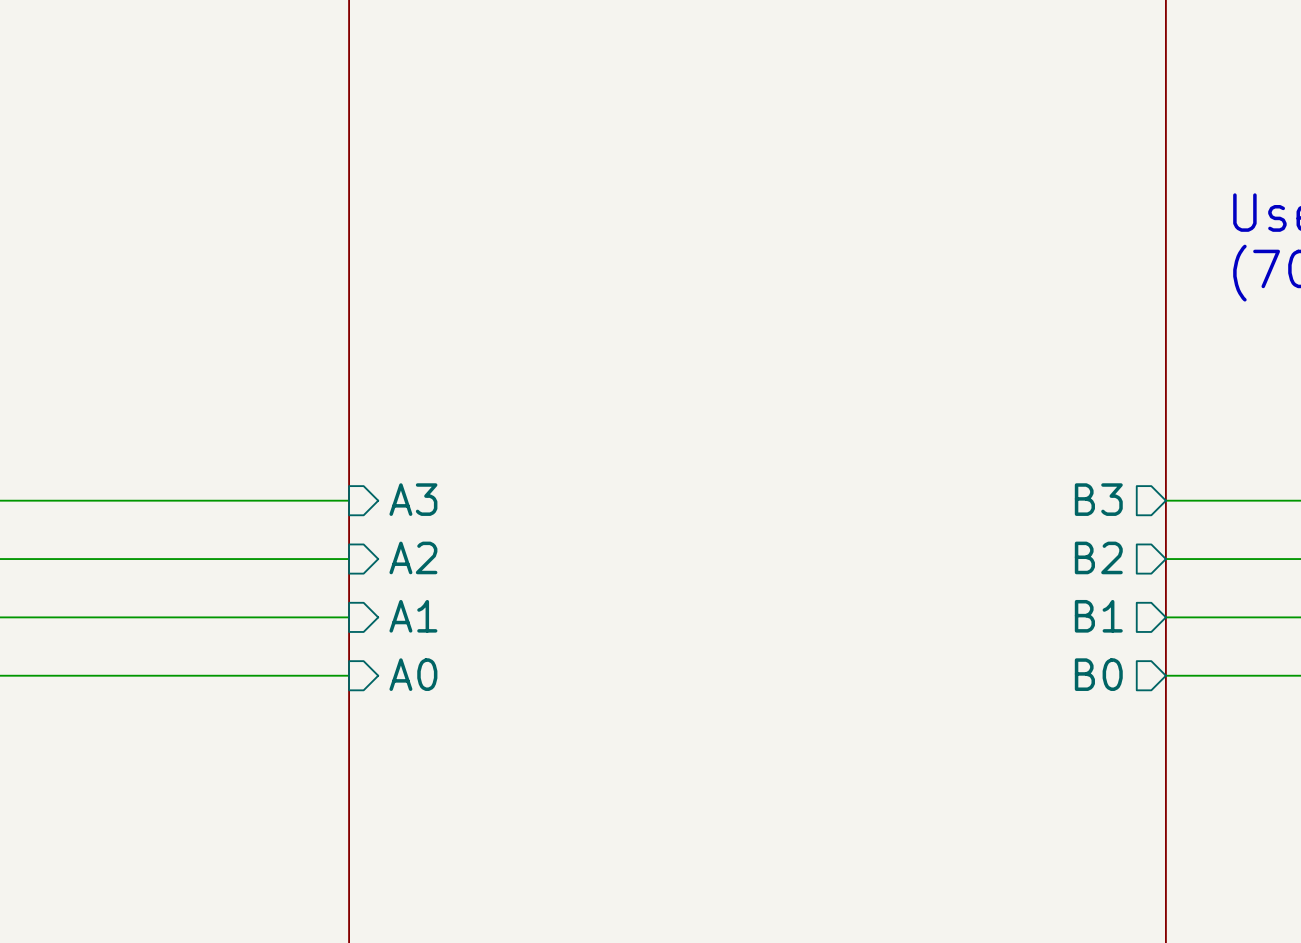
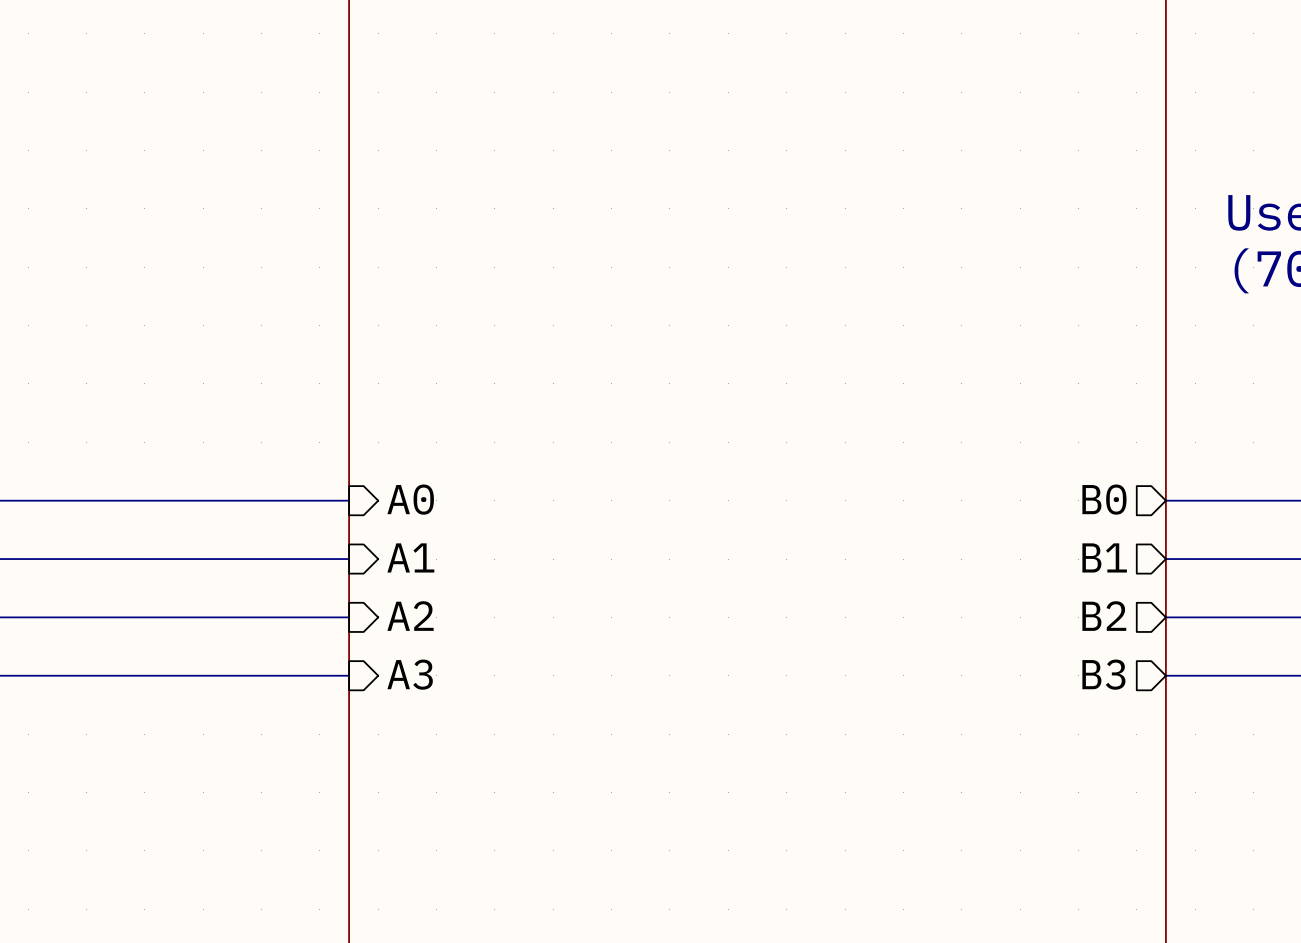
sheet pin: A3 (413, 499) -> A0 (410, 499)
sheet pin: B3 (1098, 499) -> B0 (1104, 499)
sheet pin: A2 (413, 557) -> A1 (410, 557)
sheet pin: B2 (1098, 557) -> B1 (1104, 557)
sheet pin: A1 (413, 616) -> A2 (410, 616)
sheet pin: B1 (1098, 616) -> B2 (1104, 616)
sheet pin: A0 (413, 674) -> A3 (410, 674)
sheet pin: B0 (1098, 674) -> B3 (1103, 674)

